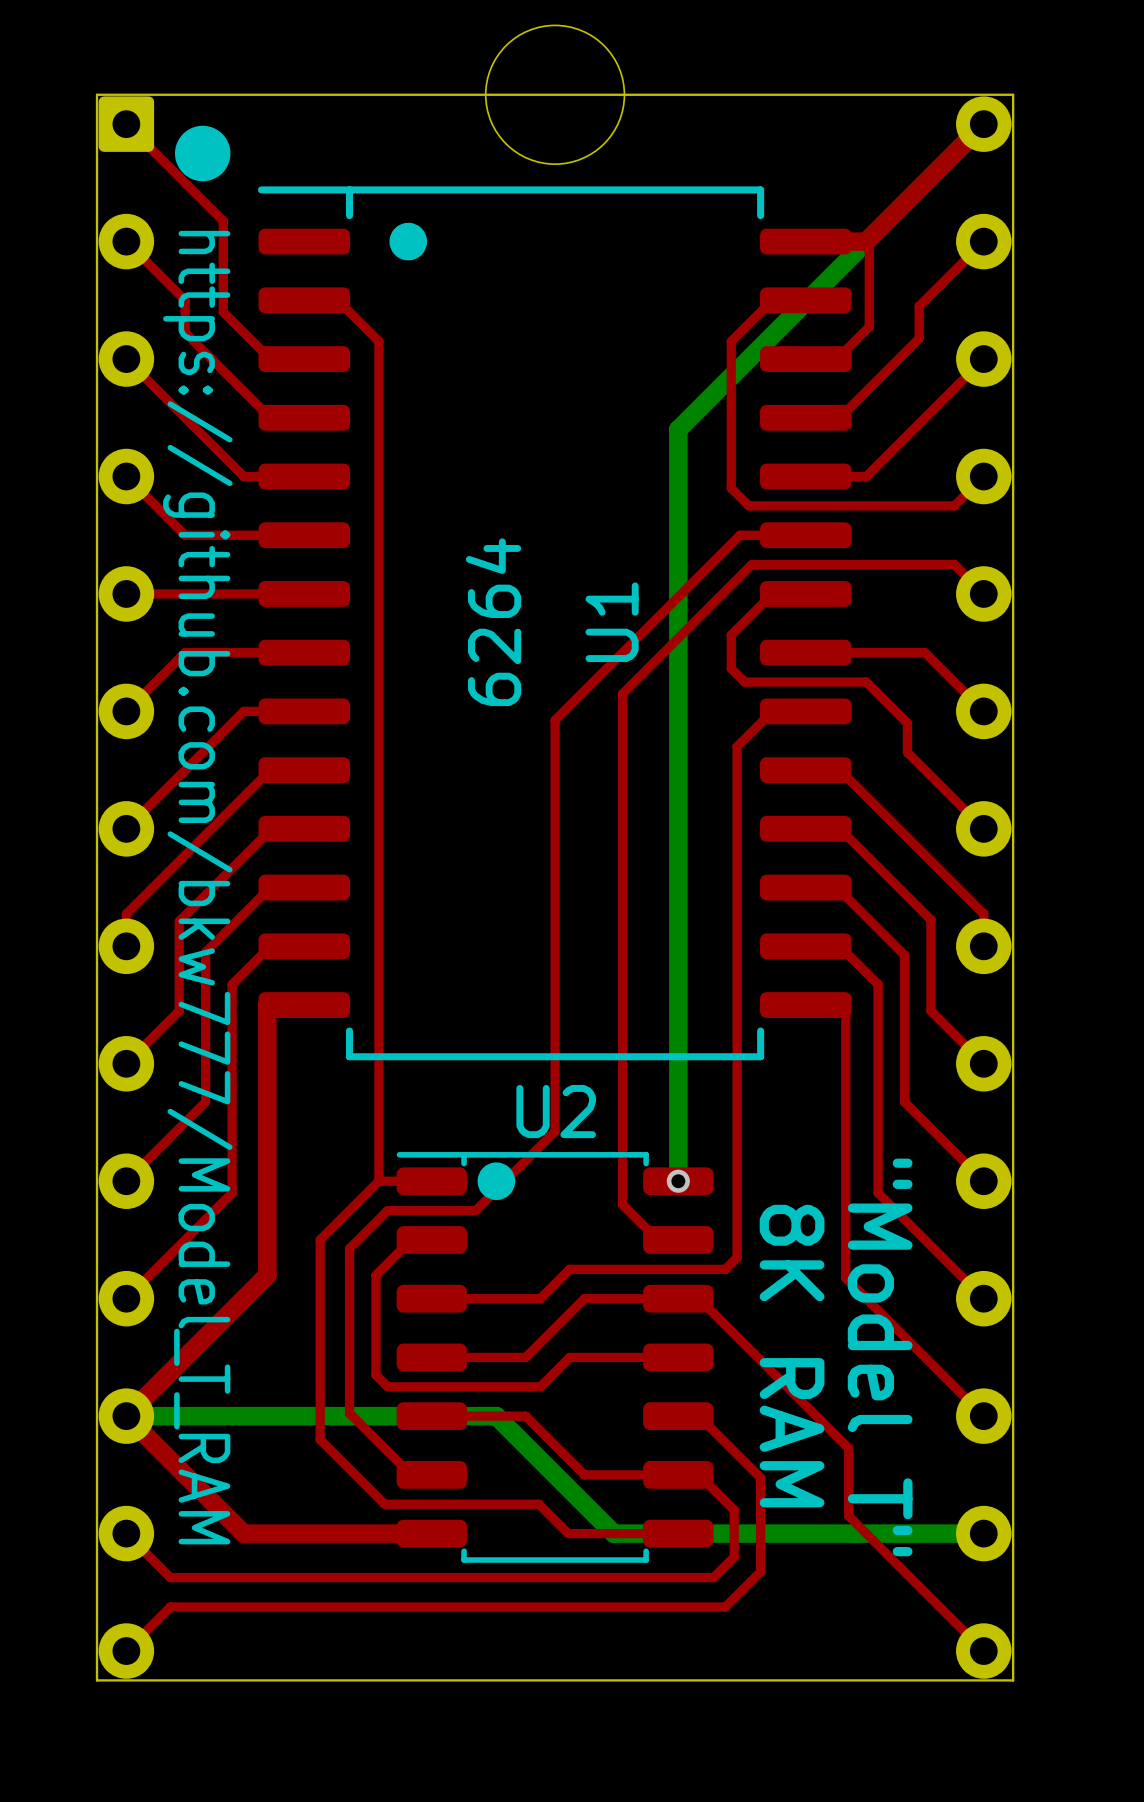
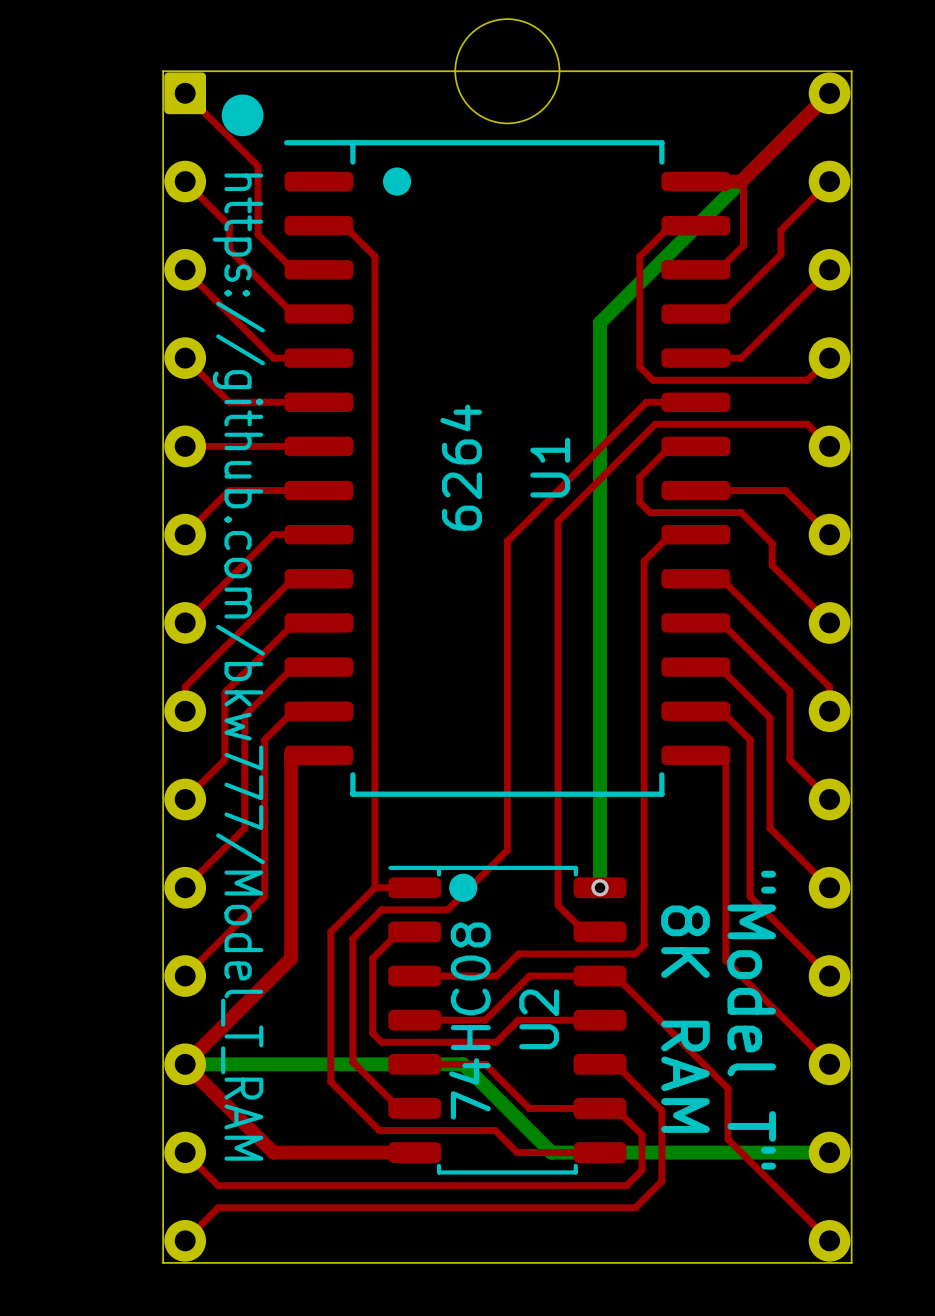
U2 name rotation: 0° (556, 1111) -> 90° counterclockwise (539, 1019)
U2 name position: U2 (556, 1111) -> U2 (539, 1019)
U2 value: none -> 74HC08 (469, 1020)

